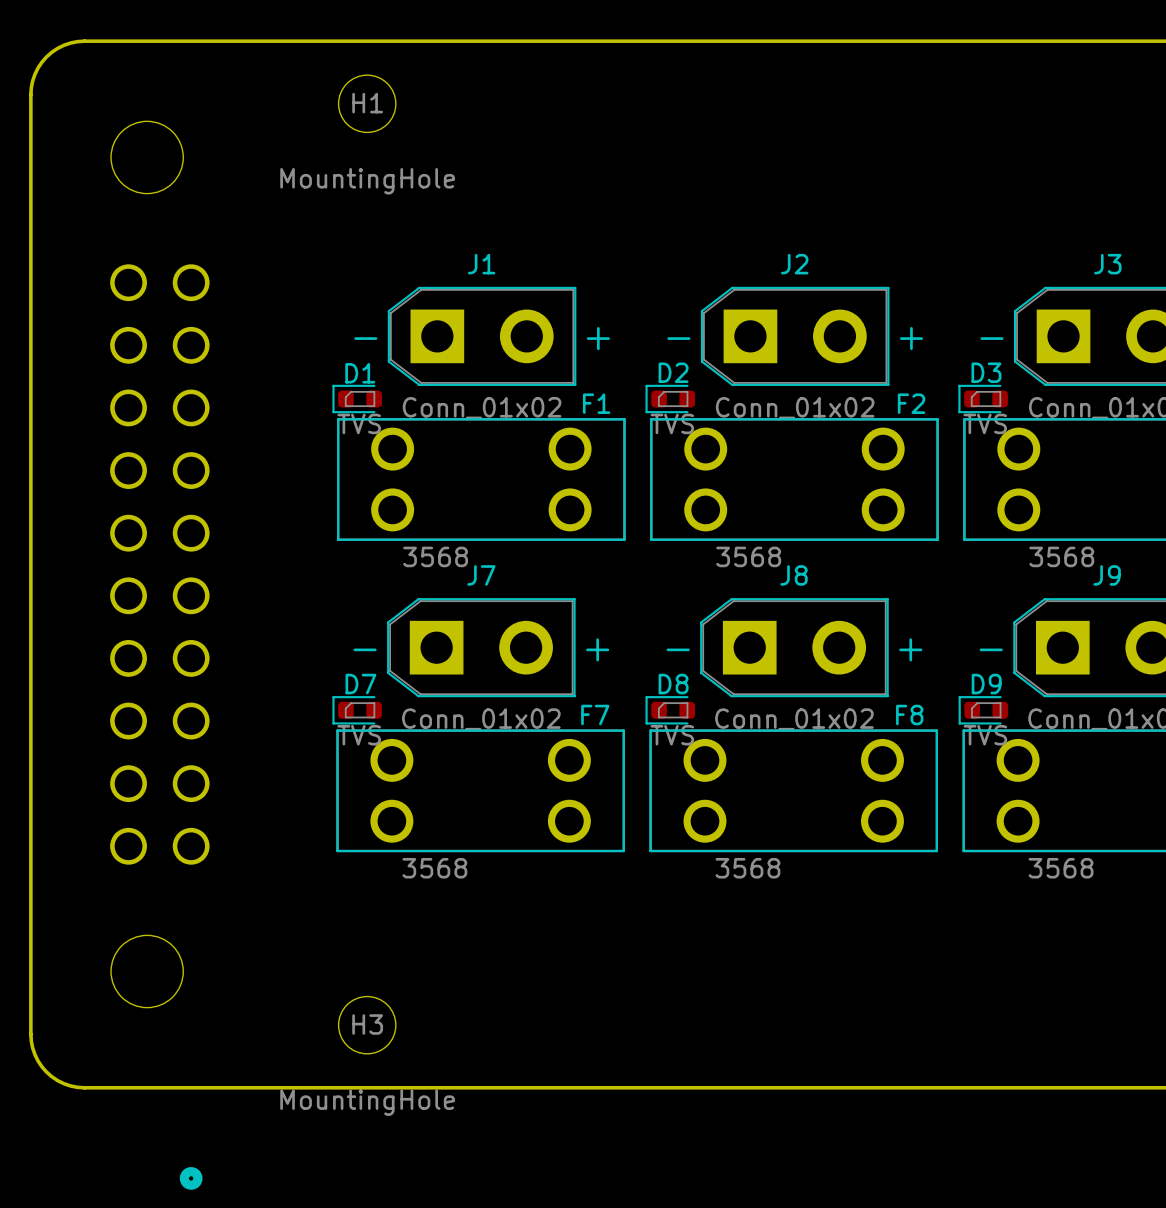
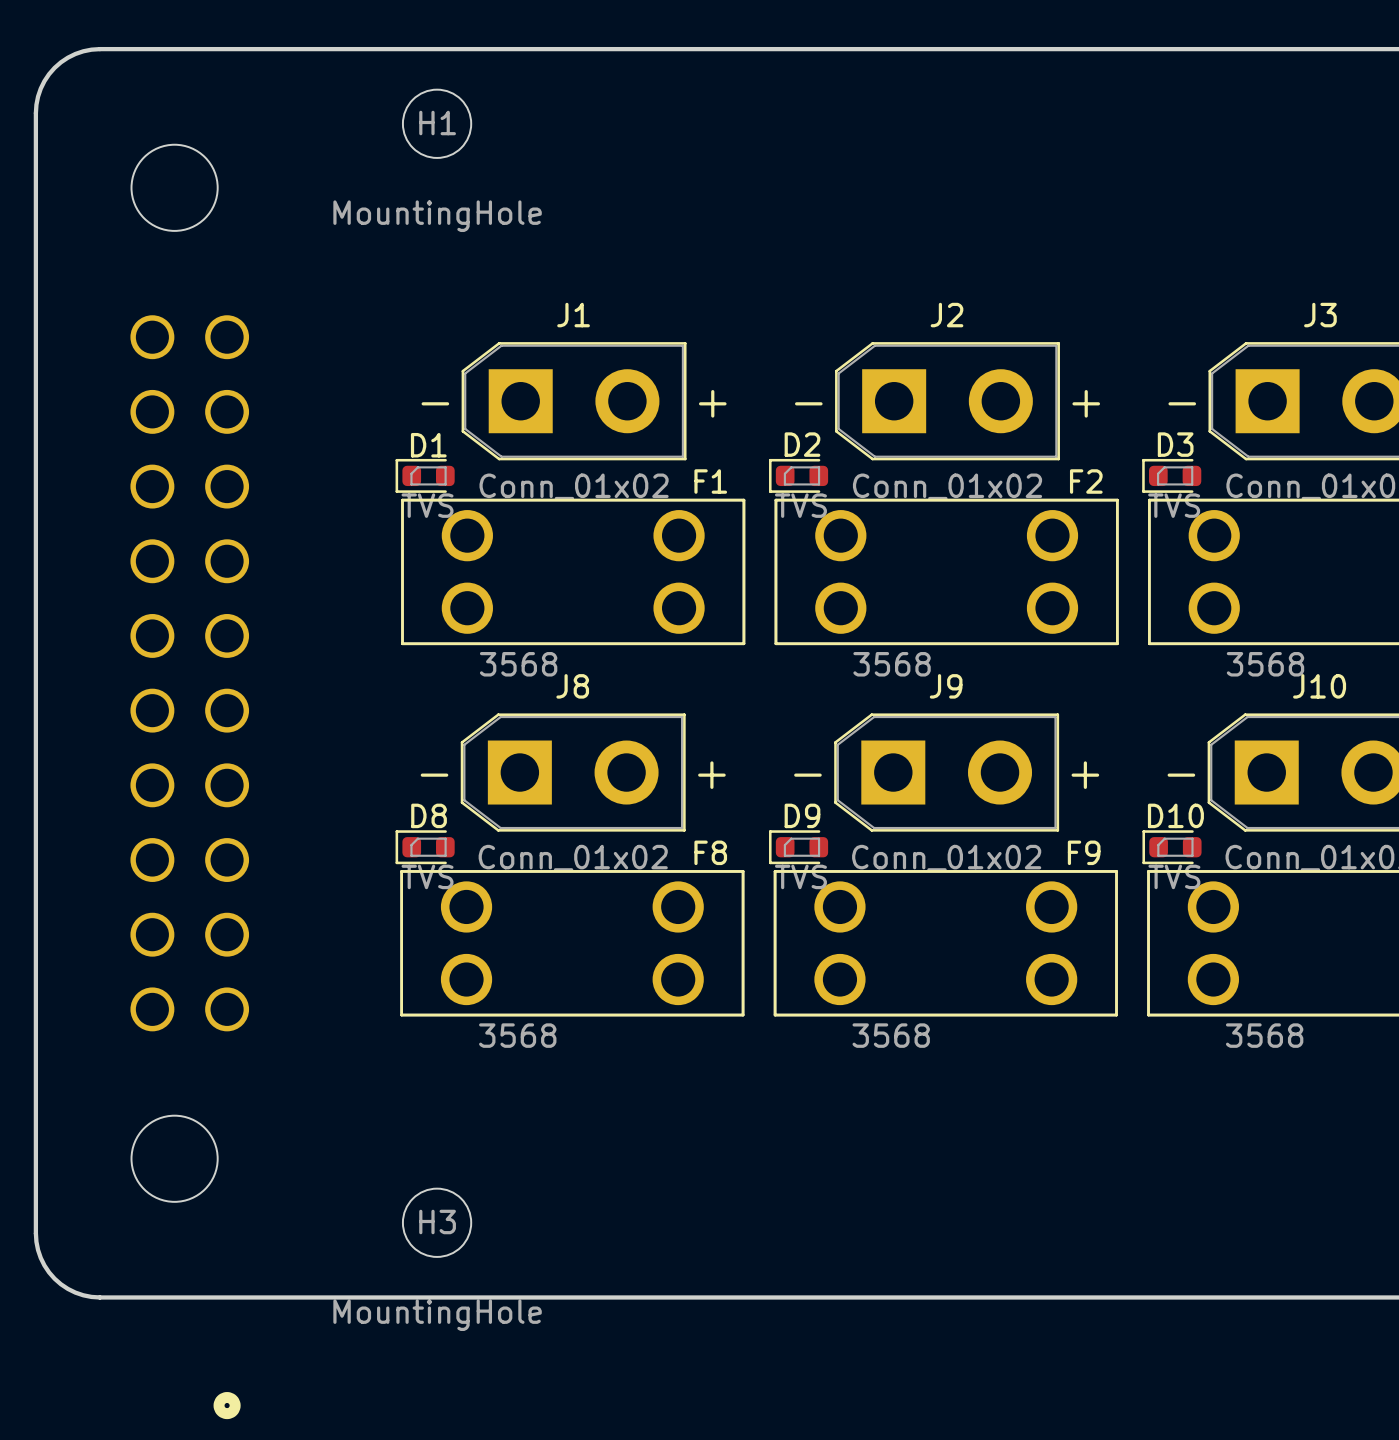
J7 name: J7 (481, 575) -> J8 (572, 686)
J8 name: J8 (794, 575) -> J9 (946, 686)
J9 name: J9 (1107, 575) -> J10 (1319, 686)
D7 name: D7 (360, 684) -> D8 (429, 815)
D8 name: D8 (673, 684) -> D9 (802, 815)
D9 name: D9 (986, 684) -> D10 (1175, 815)
F7 name: F7 (595, 715) -> F8 (710, 852)
F8 name: F8 (909, 715) -> F9 (1084, 852)

